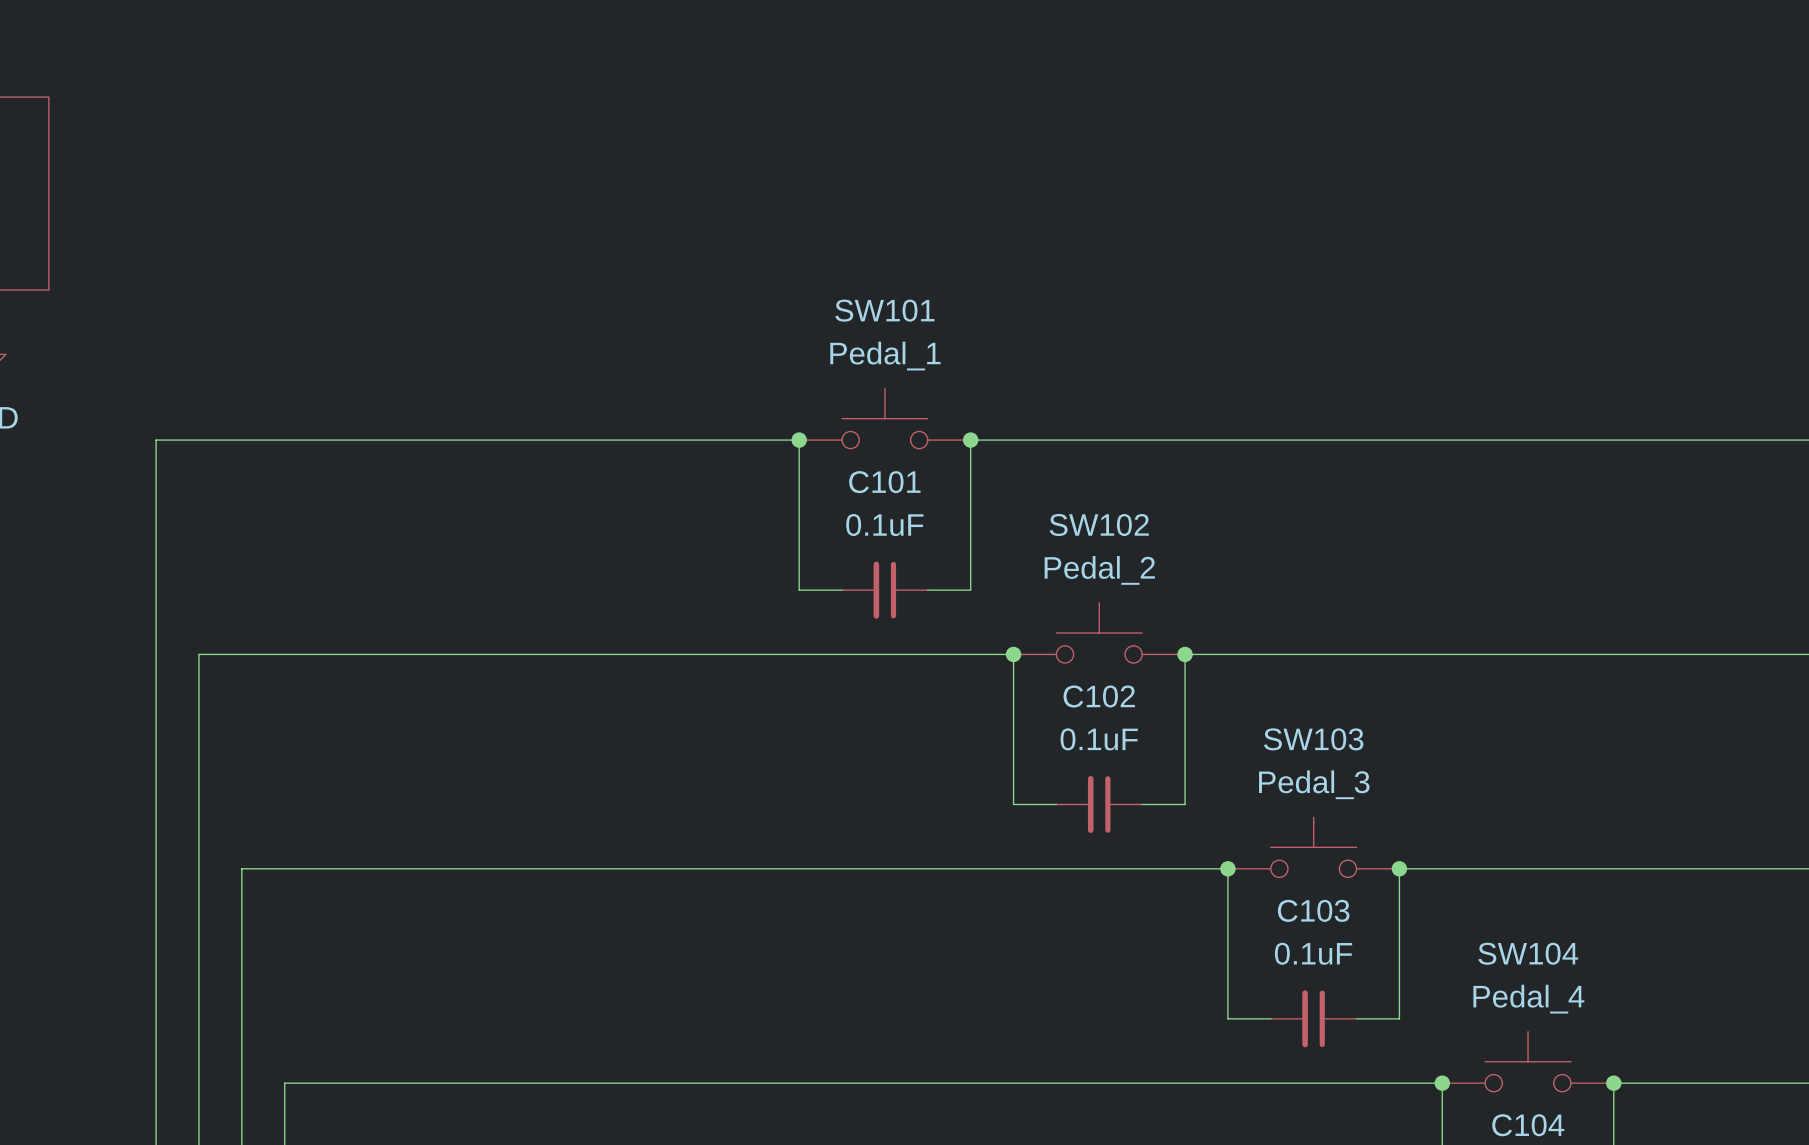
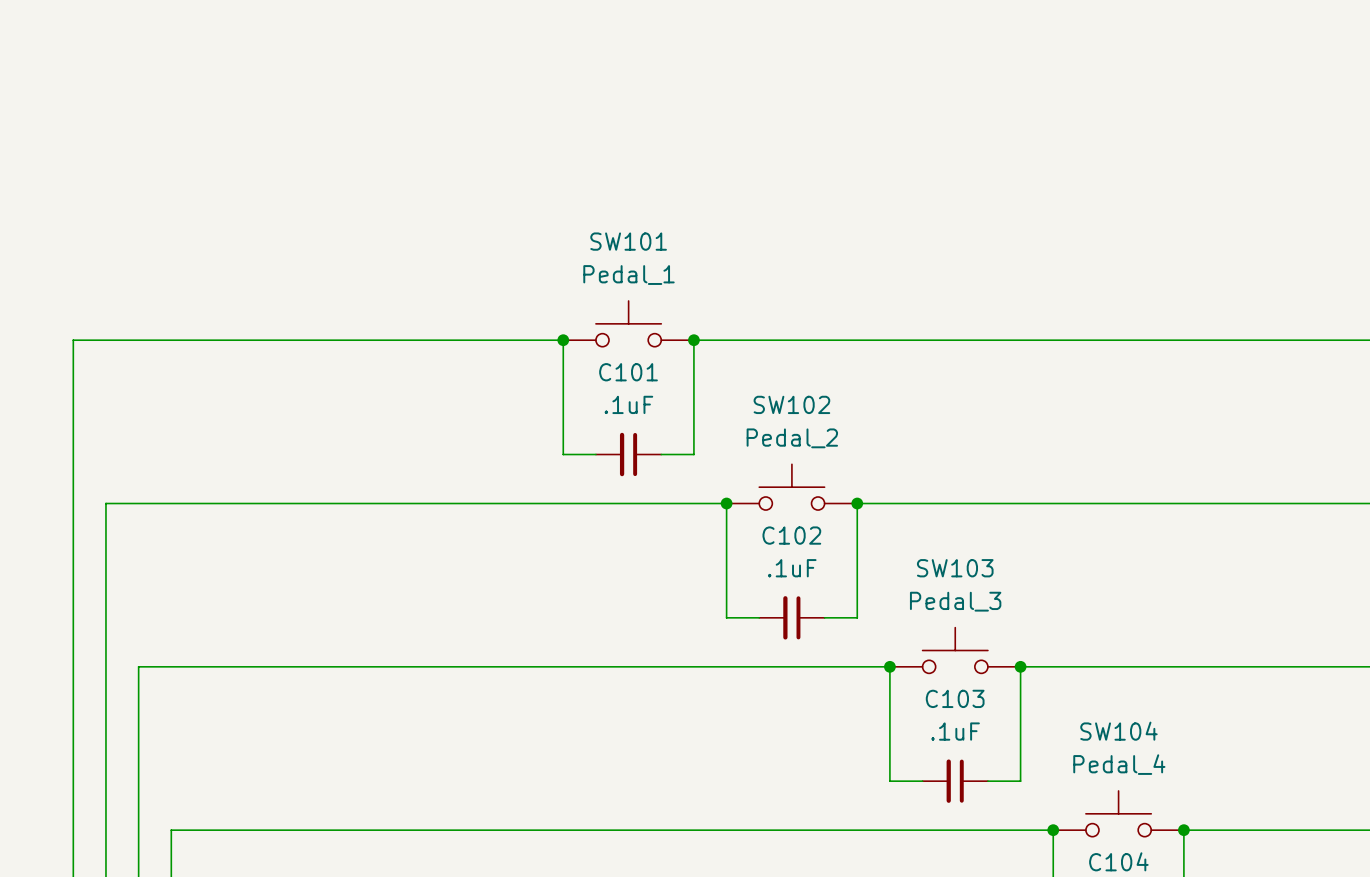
C101 value: 0.1uF (884, 525) -> .1uF (628, 404)
C102 value: 0.1uF (1099, 739) -> .1uF (792, 568)
C103 value: 0.1uF (1313, 953) -> .1uF (955, 731)

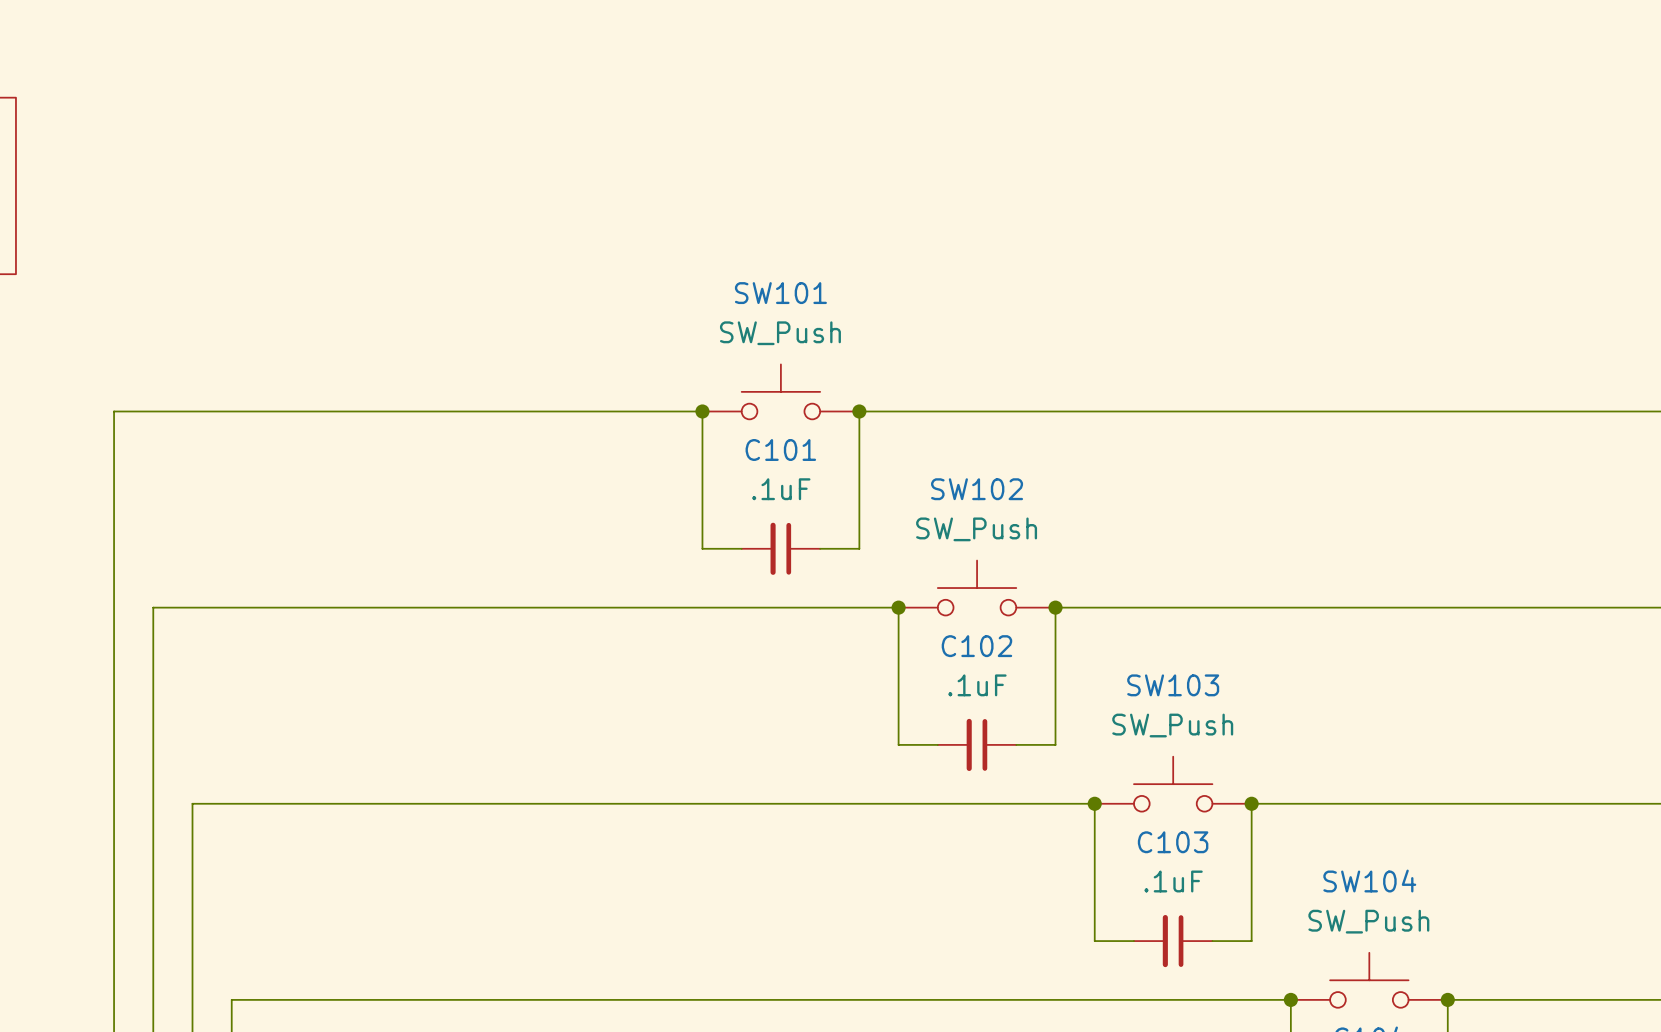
SW101 value: Pedal_1 (629, 275) -> SW_Push (780, 333)
SW102 value: Pedal_2 (792, 438) -> SW_Push (976, 529)
SW103 value: Pedal_3 (955, 601) -> SW_Push (1172, 725)
SW104 value: Pedal_4 (1119, 764) -> SW_Push (1368, 921)

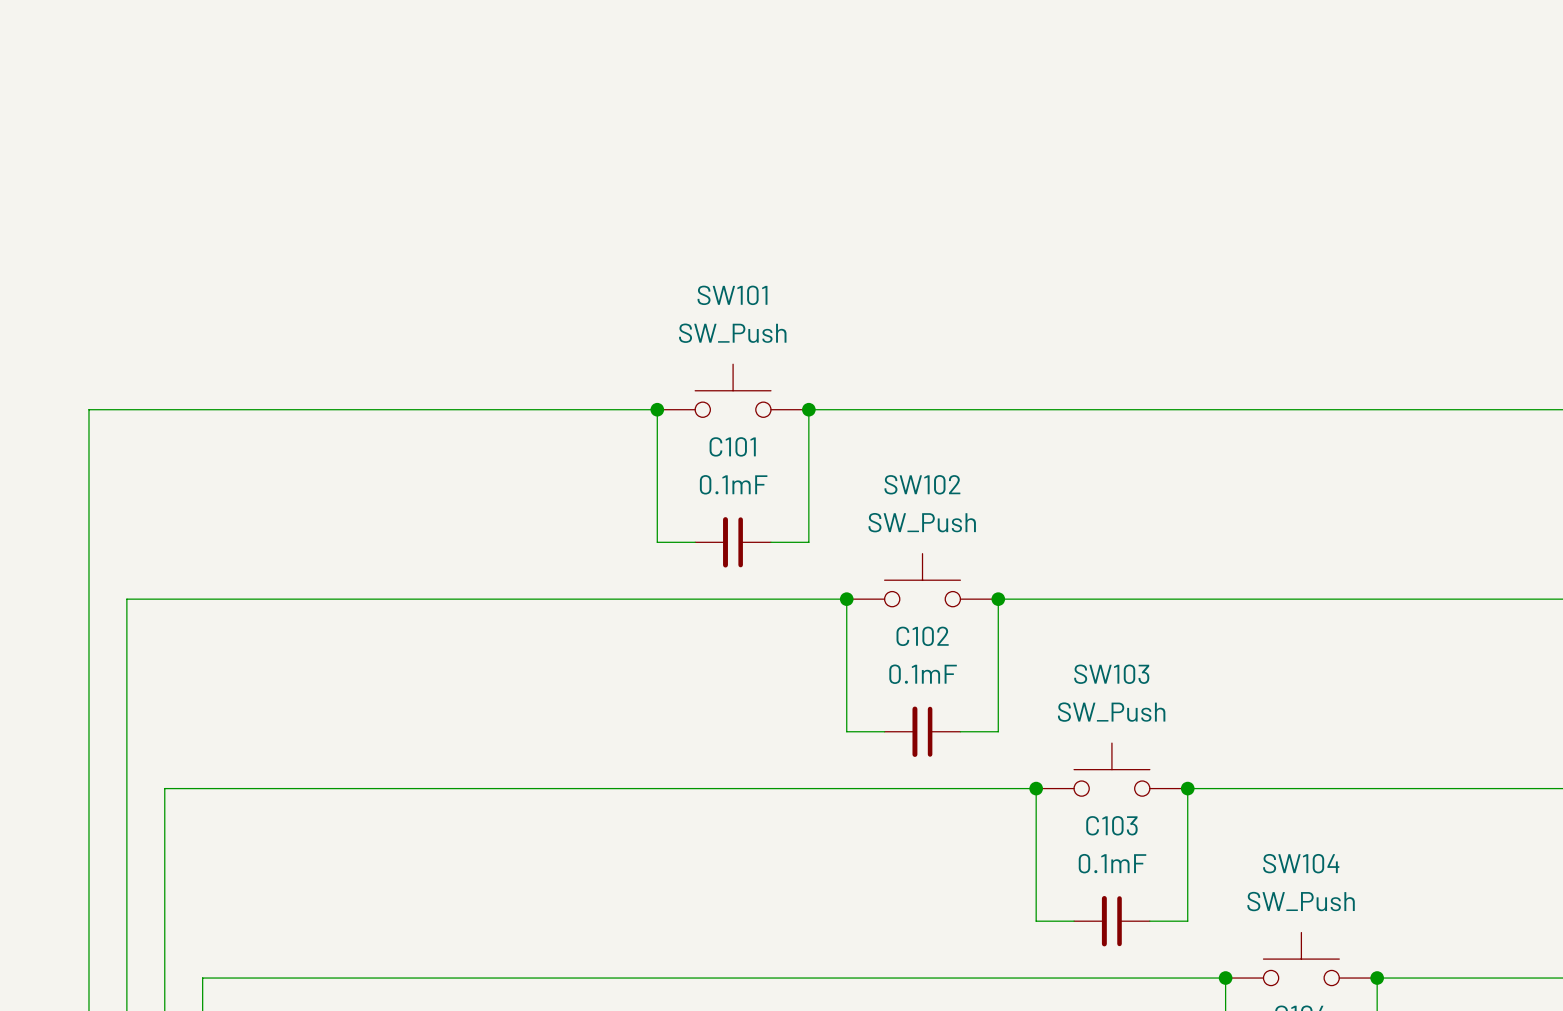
C101 value: .1uF (781, 489) -> 0.1mF (733, 484)
C102 value: .1uF (977, 685) -> 0.1mF (923, 674)
C103 value: .1uF (1173, 881) -> 0.1mF (1112, 863)

